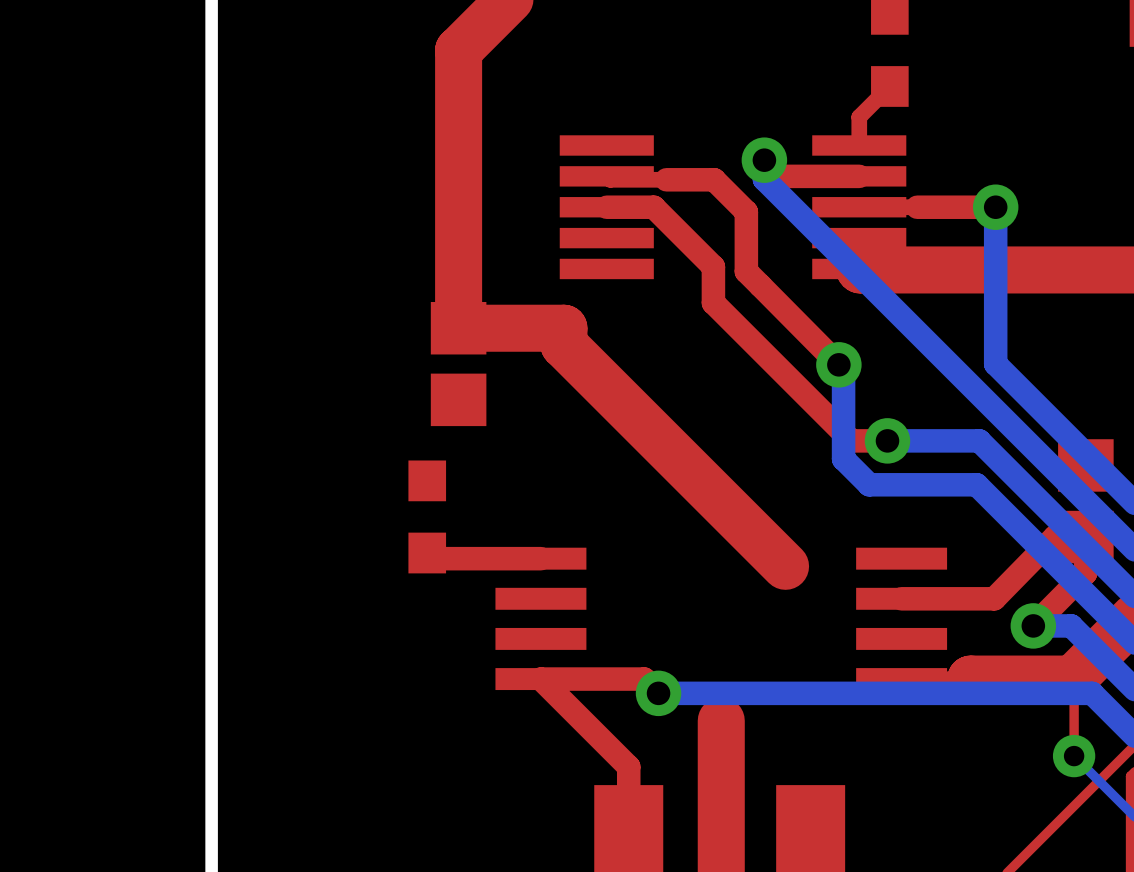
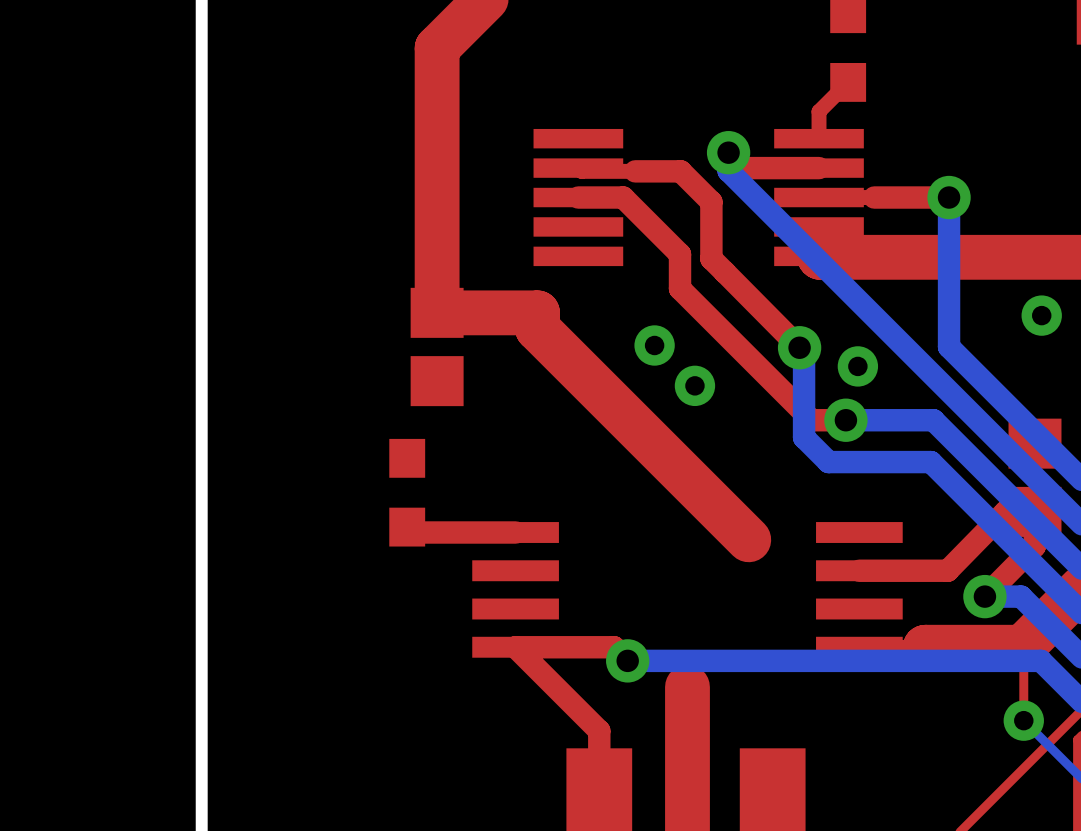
via: none -> (1041, 315)
via: none -> (654, 345)
via: none -> (857, 366)
via: none -> (694, 385)

